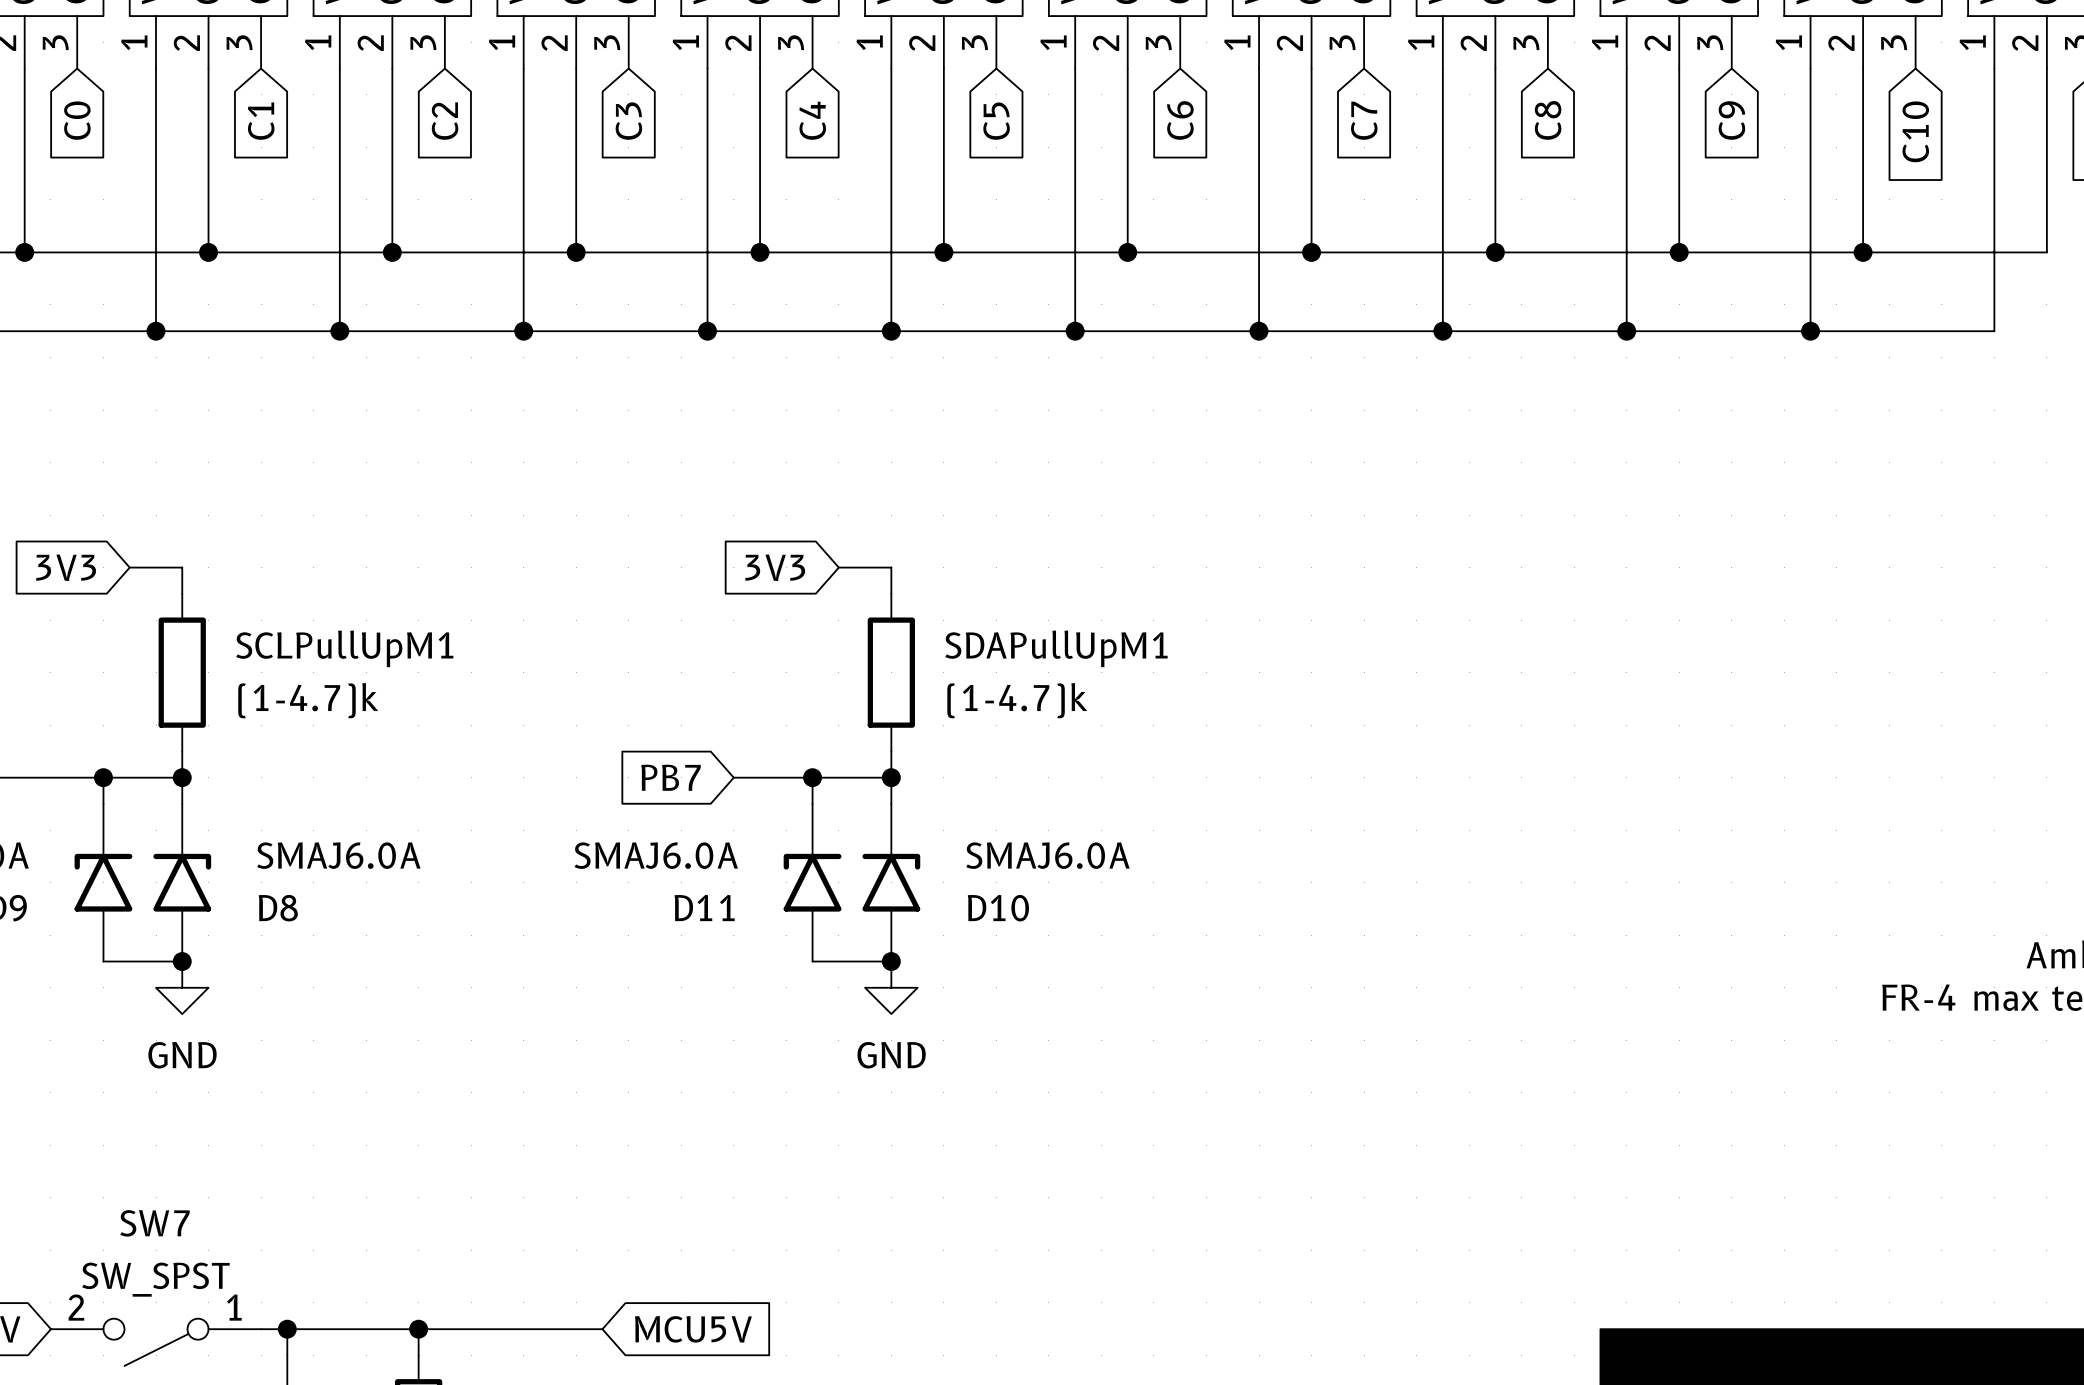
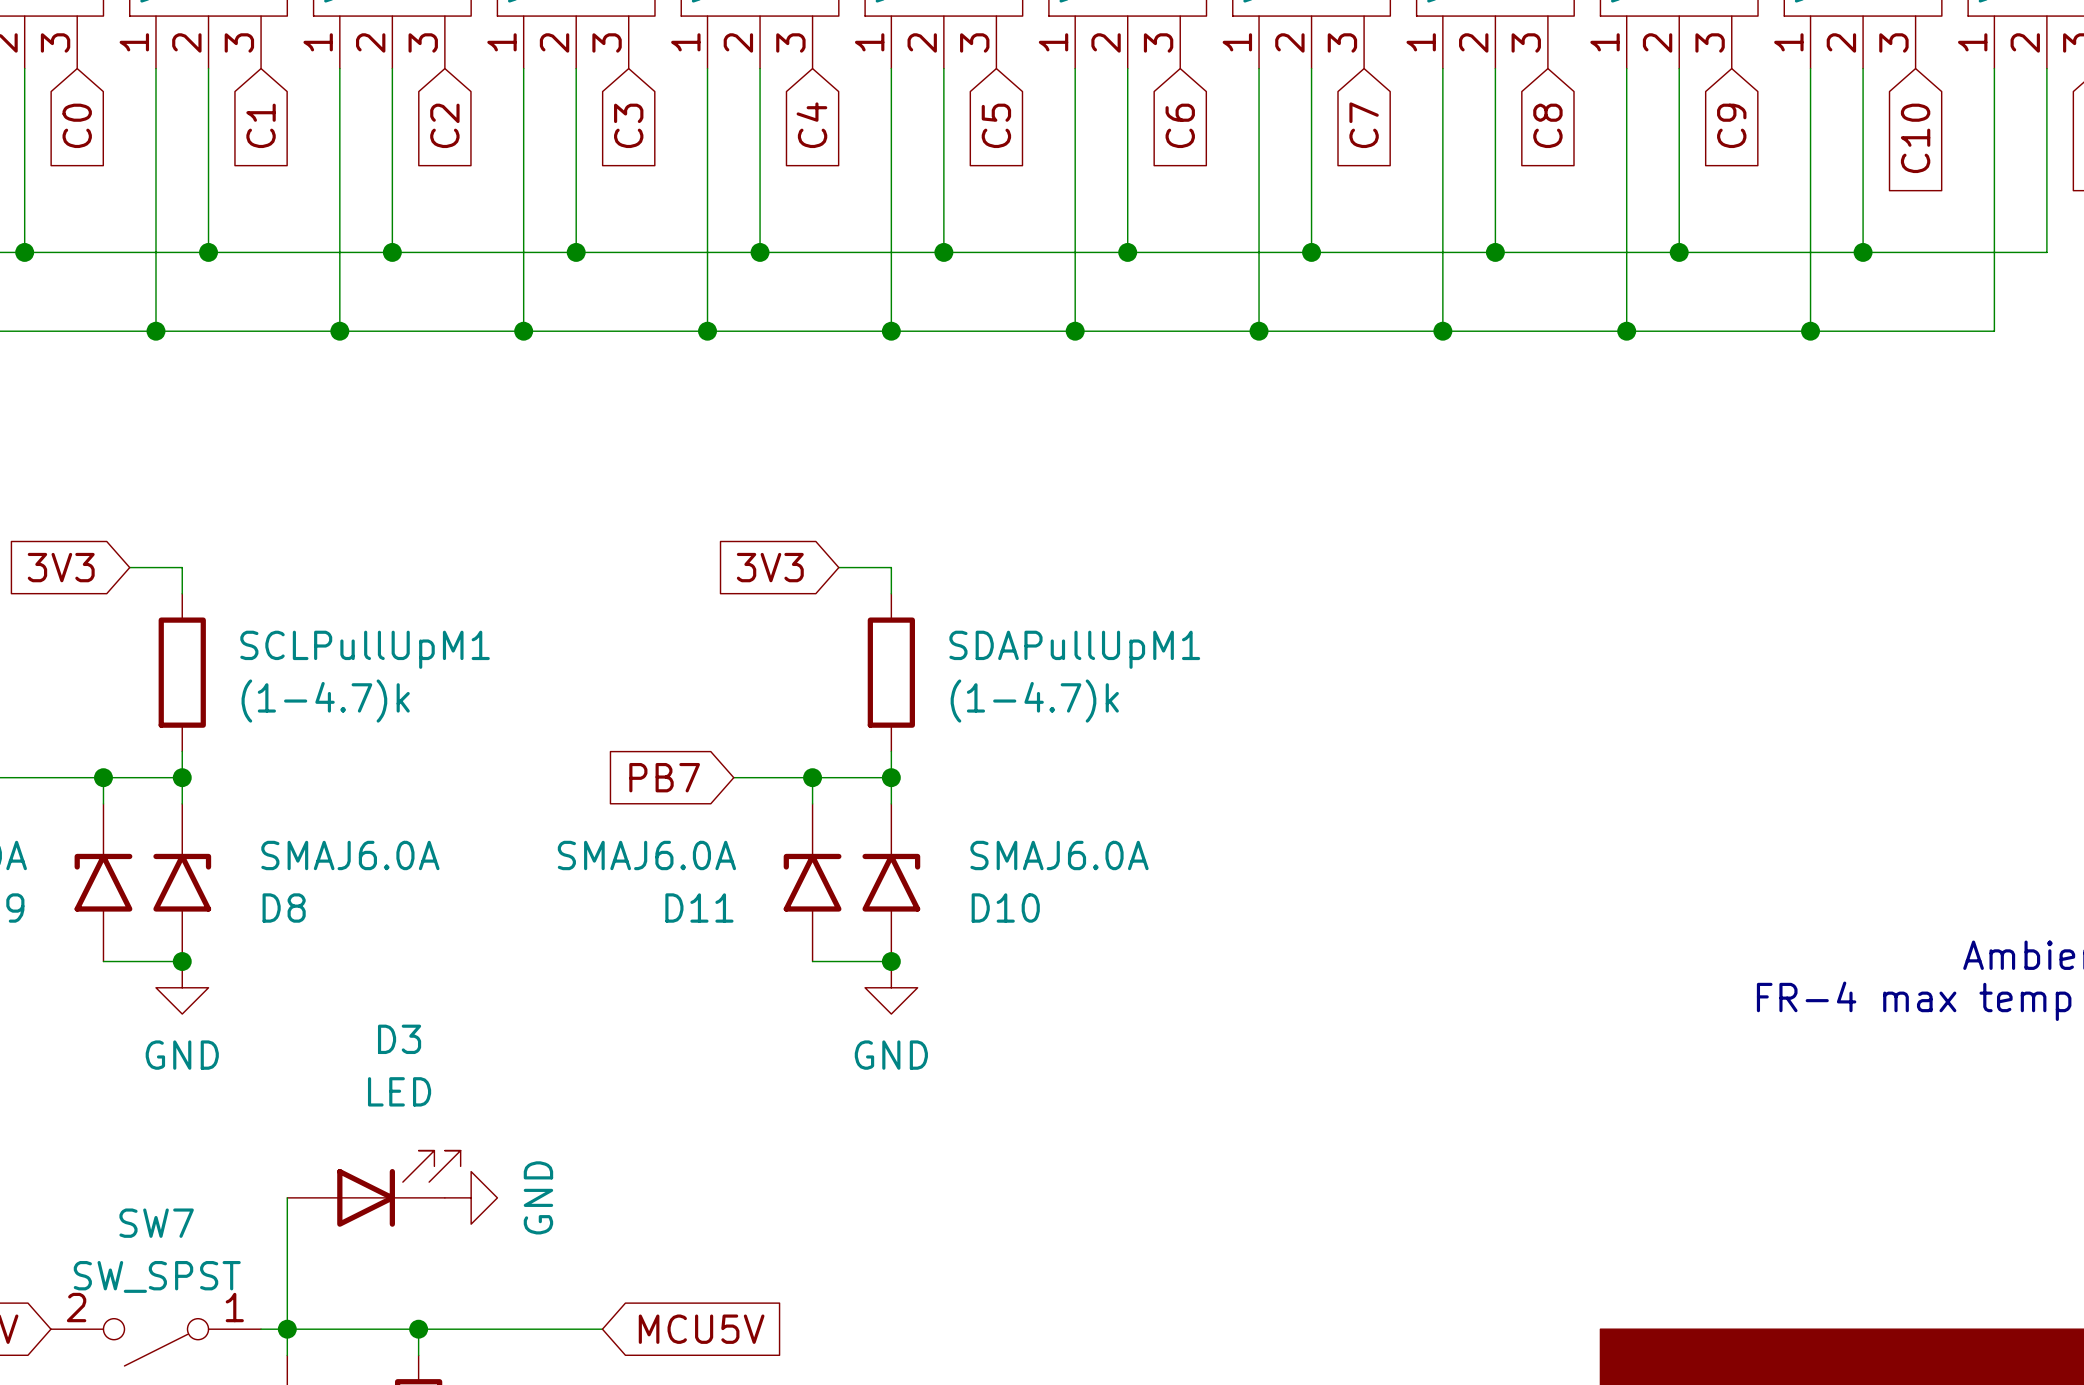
D3: none -> LED (373, 1188)
wire: none -> (287, 1197) (287, 1329)
power symbol: none -> GND (471, 1197)

